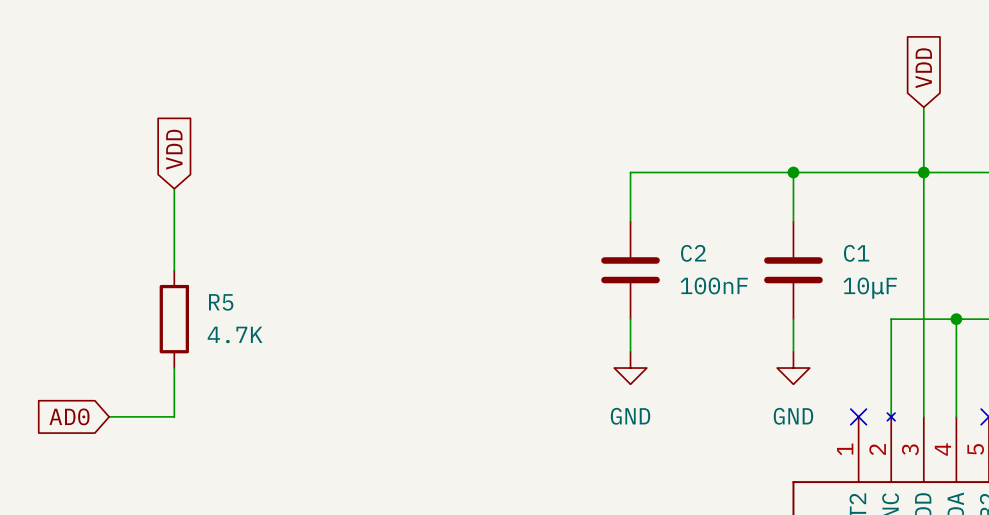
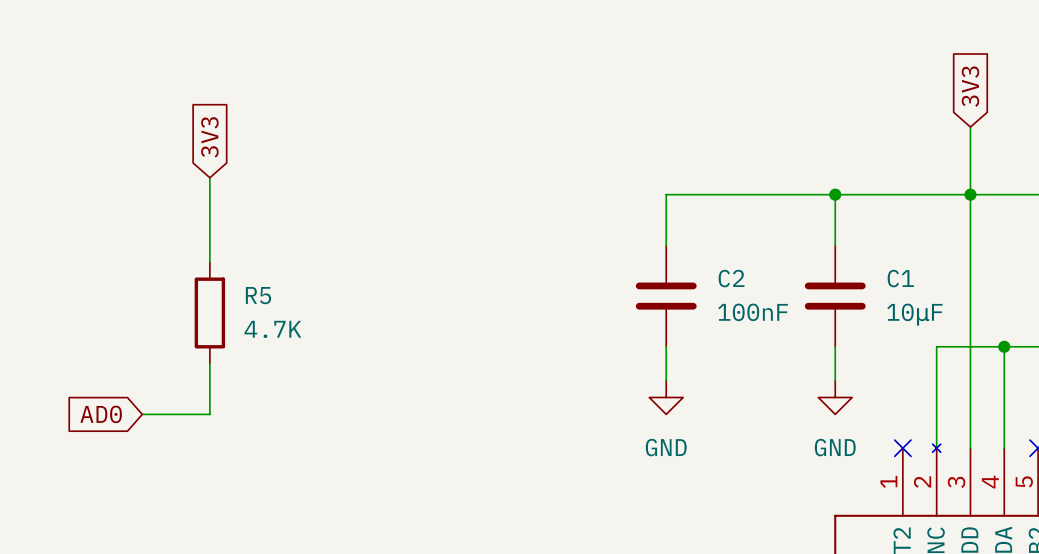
global label: VDD (923, 68) -> 3V3 (970, 86)
global label: none -> 3V3 (209, 137)
global label: VDD (174, 149) -> none
wire: (174, 188) (174, 270) -> (209, 177) (209, 262)
R5 position: (174, 319) -> (209, 312)
wire: (174, 368) (174, 416) (109, 416) -> (209, 363) (209, 414) (142, 414)
global label position: AD0 (69, 416) -> AD0 (101, 414)

